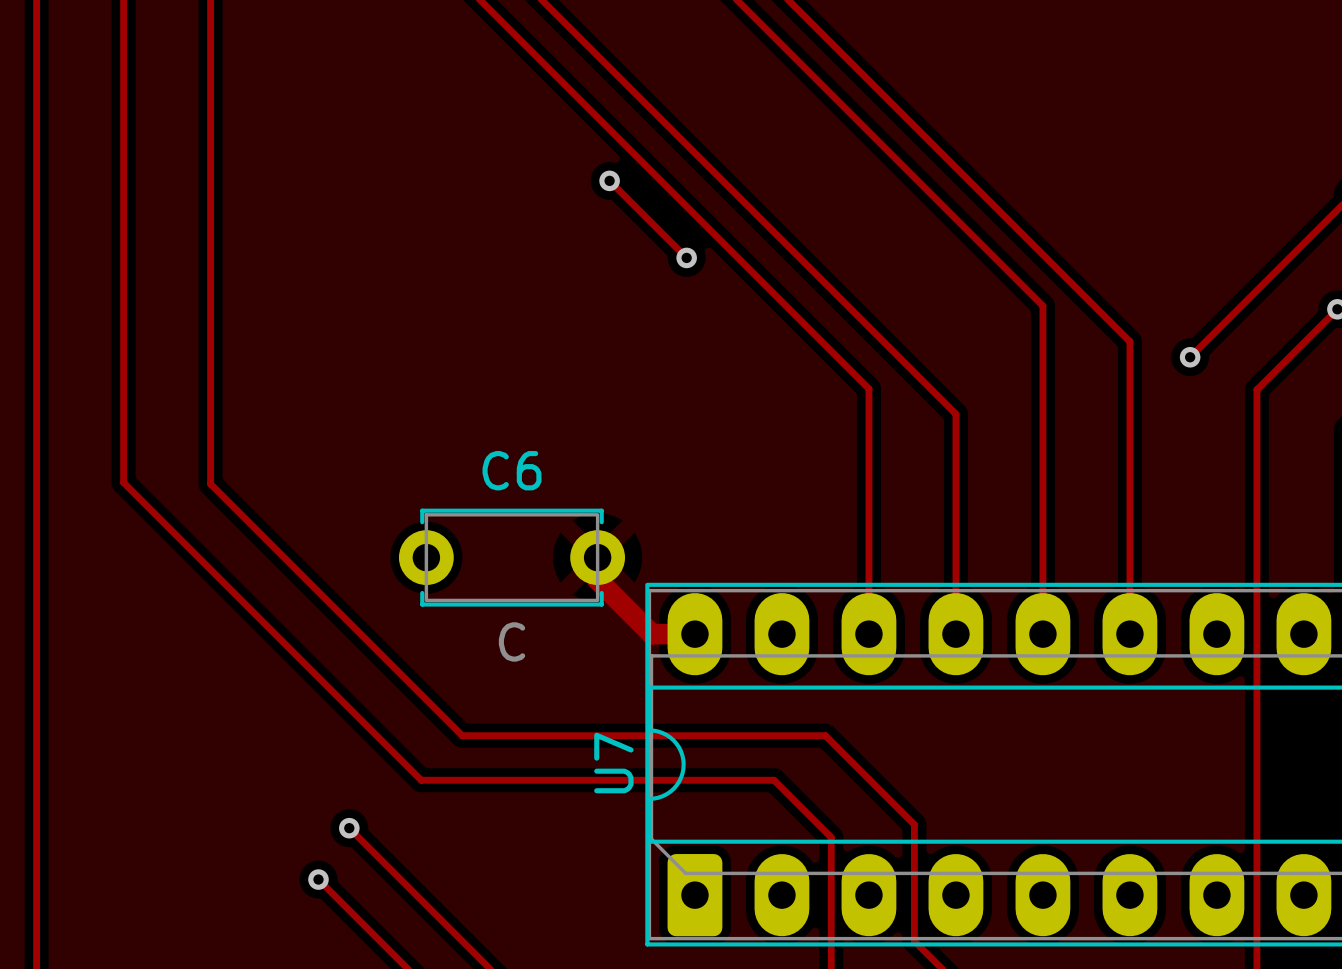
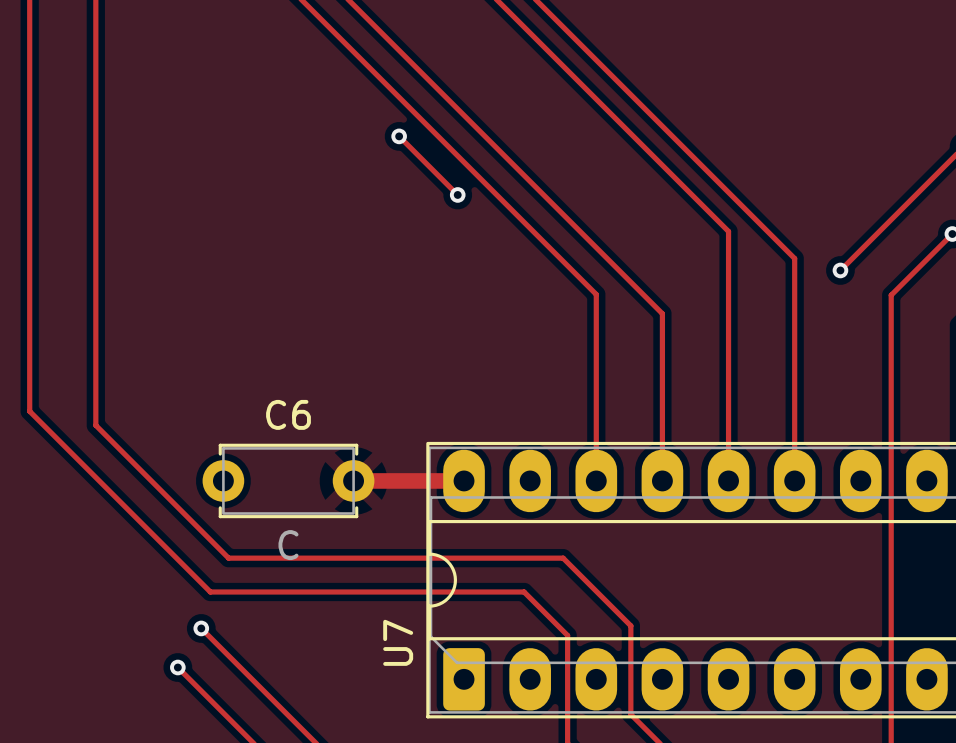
track: (123, 482) (421, 780) -> (29, 365) (29, 411) (210, 592) (255, 592)
track: (210, 483) (462, 735) -> (95, 366) (95, 425) (228, 558) (287, 558)
C6 position: (511, 557) -> (288, 480)
track: (597, 557) (597, 579) (651, 634) -> (353, 480) (431, 480)
U7 name position: U7 (613, 763) -> U7 (398, 642)

